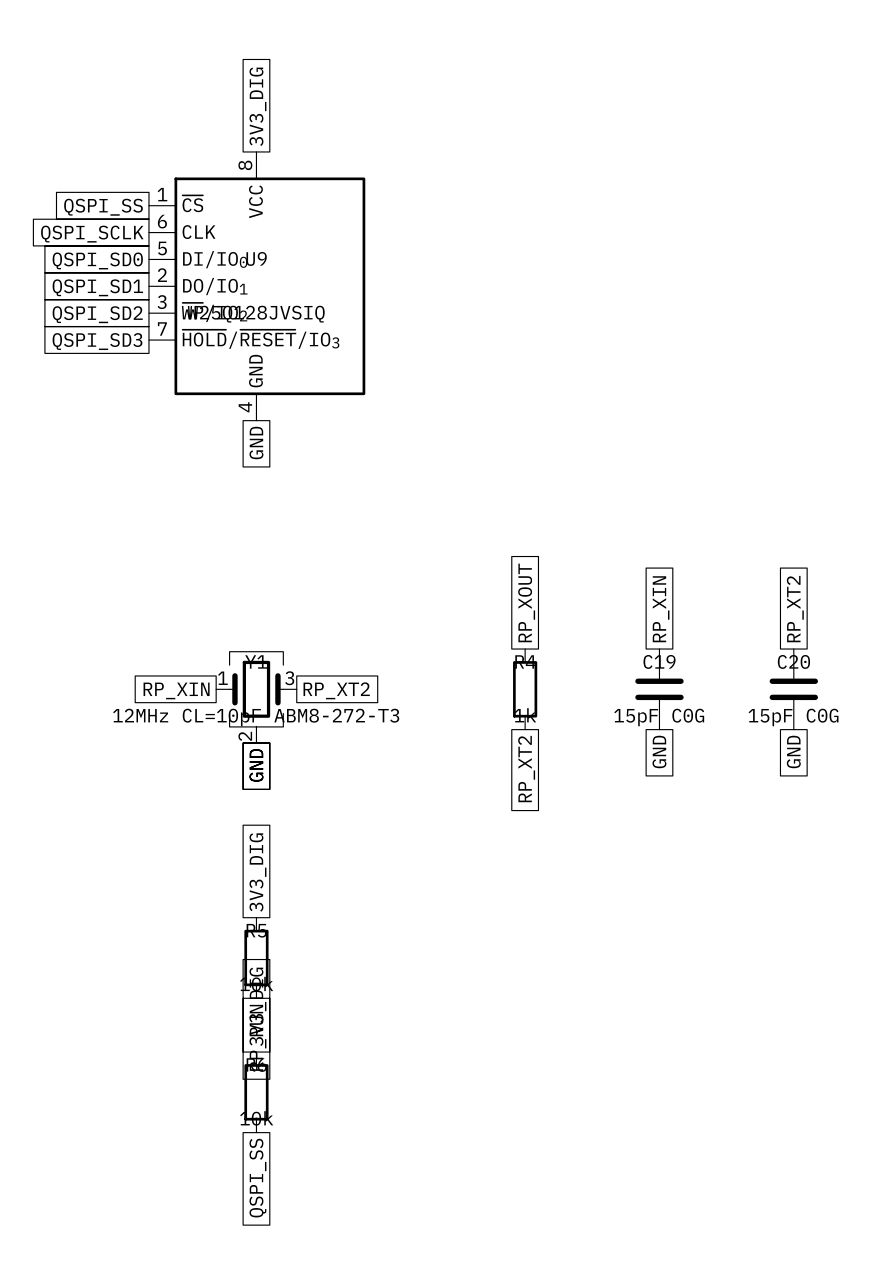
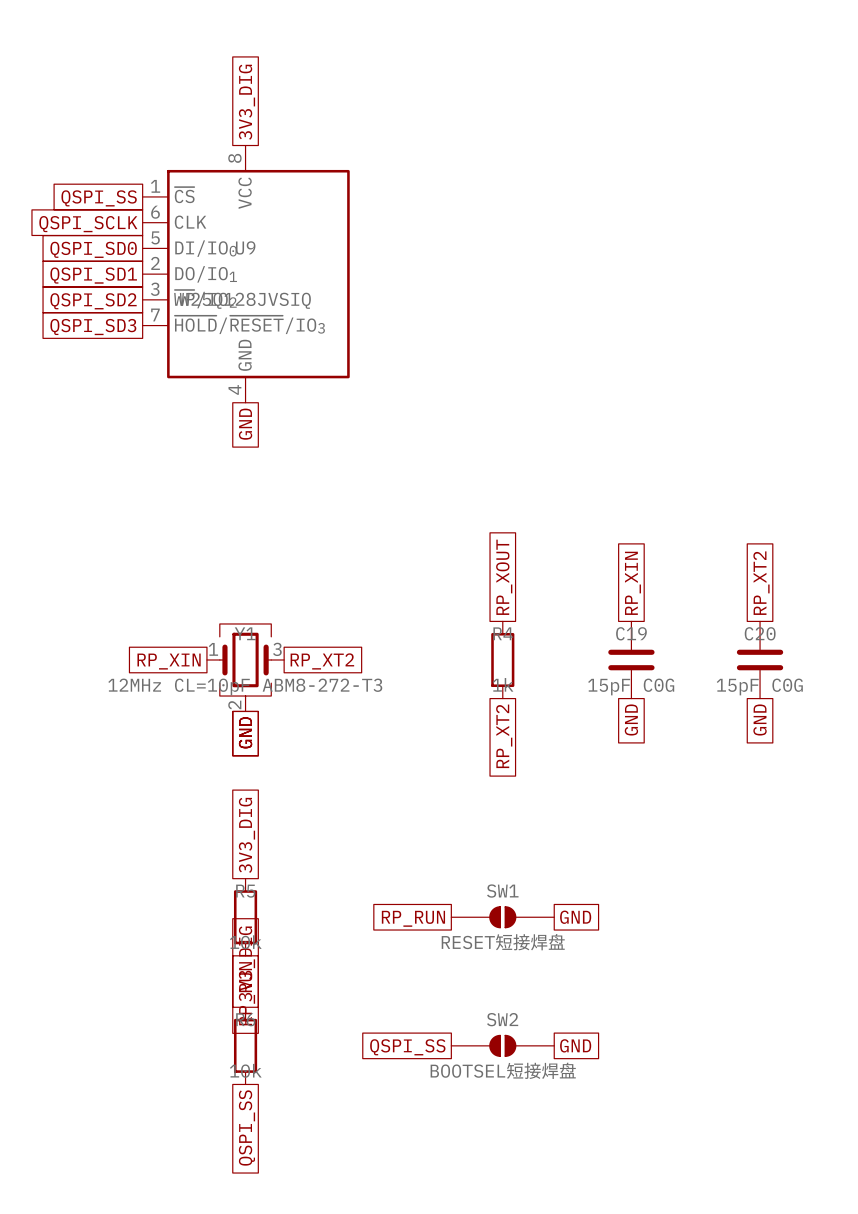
SW1: none -> RESET短接焊盘 (502, 917)
global label: none -> GND (575, 917)
global label: none -> RP_RUN (413, 918)
SW2: none -> BOOTSEL短接焊盘 (502, 1045)
global label: none -> GND (575, 1045)
global label: none -> QSPI_SS (407, 1047)

